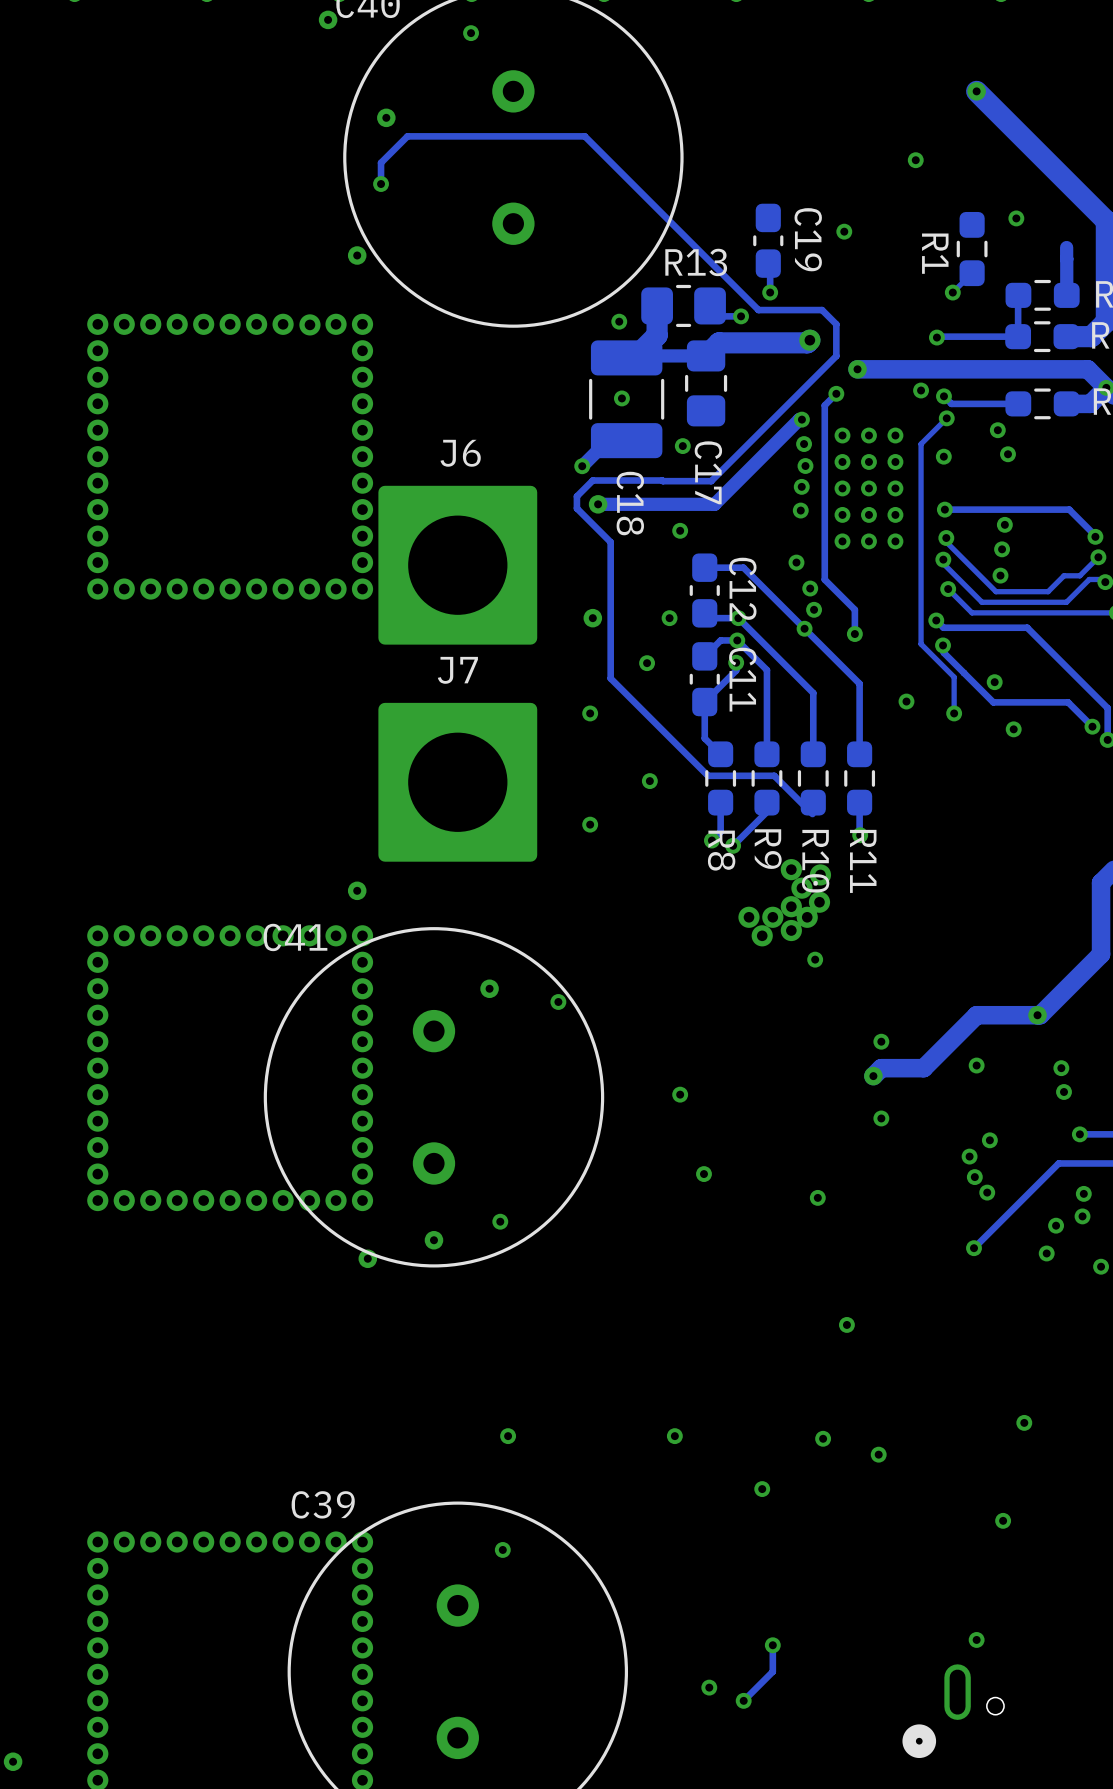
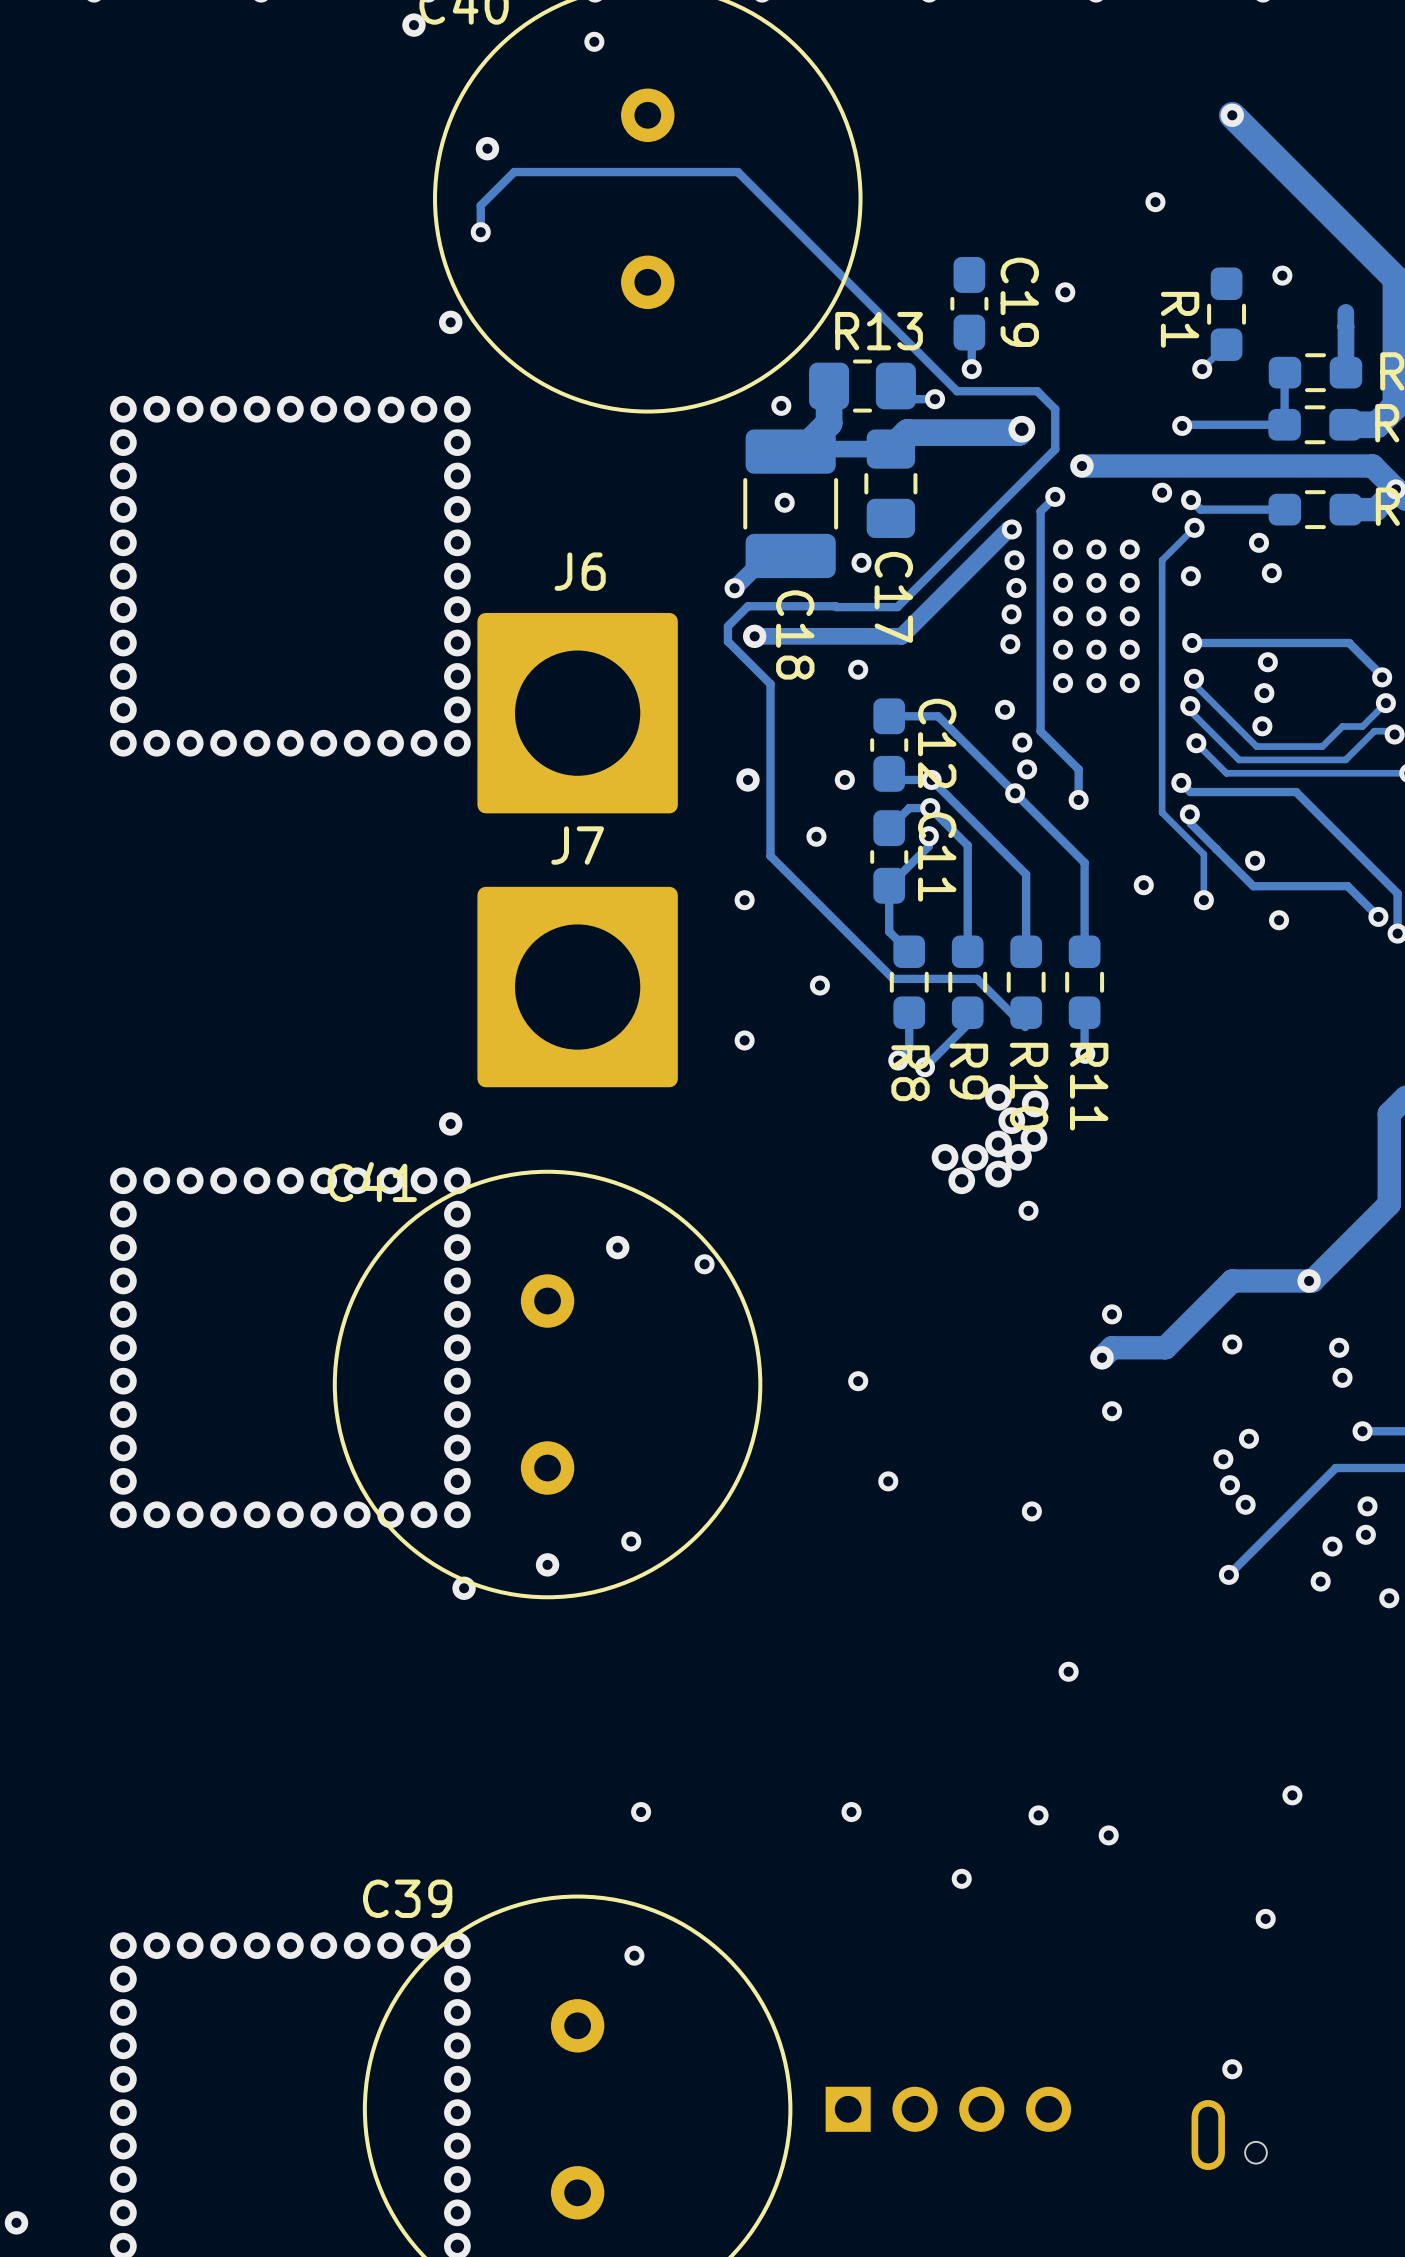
track: (772, 1645) (772, 1671) (743, 1700) -> none
via: (772, 1645) -> none
part: none -> (948, 2109)
via: (709, 1687) -> none
via: (743, 1700) -> none
part: (919, 1741) -> none

